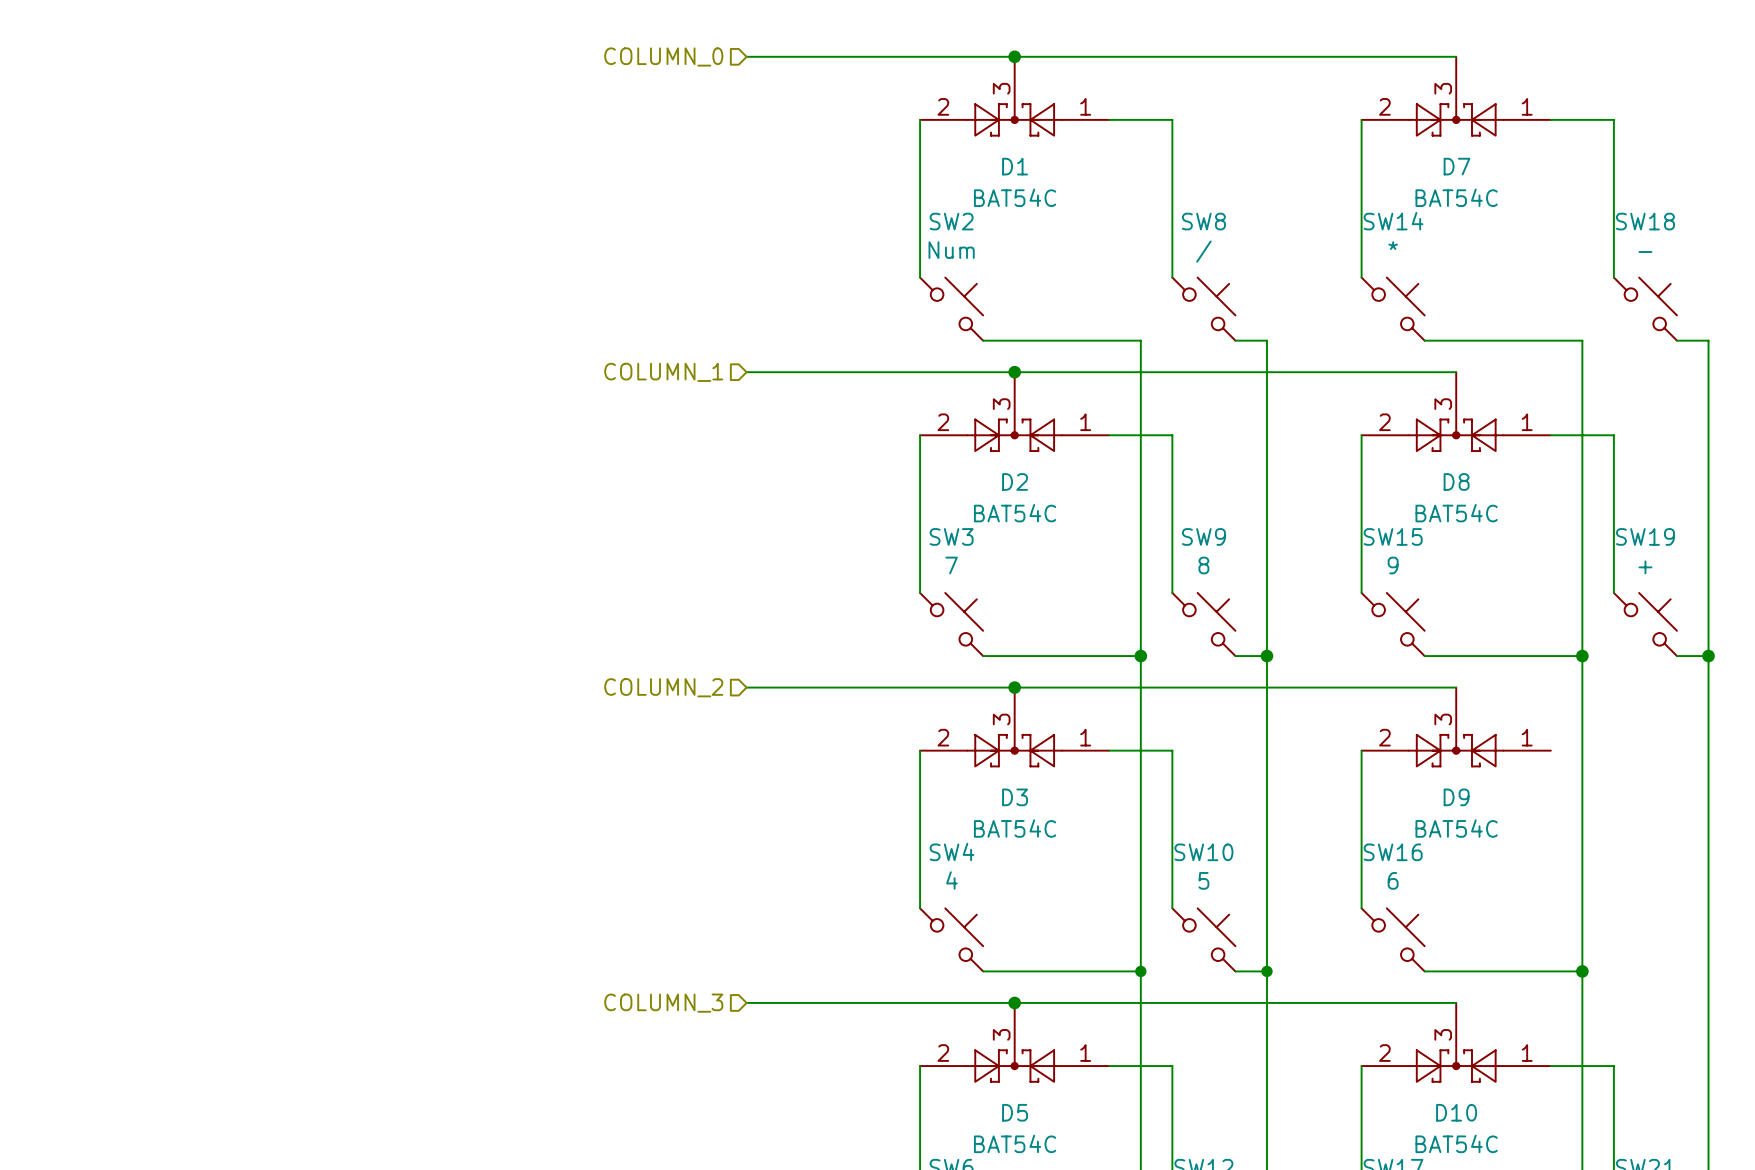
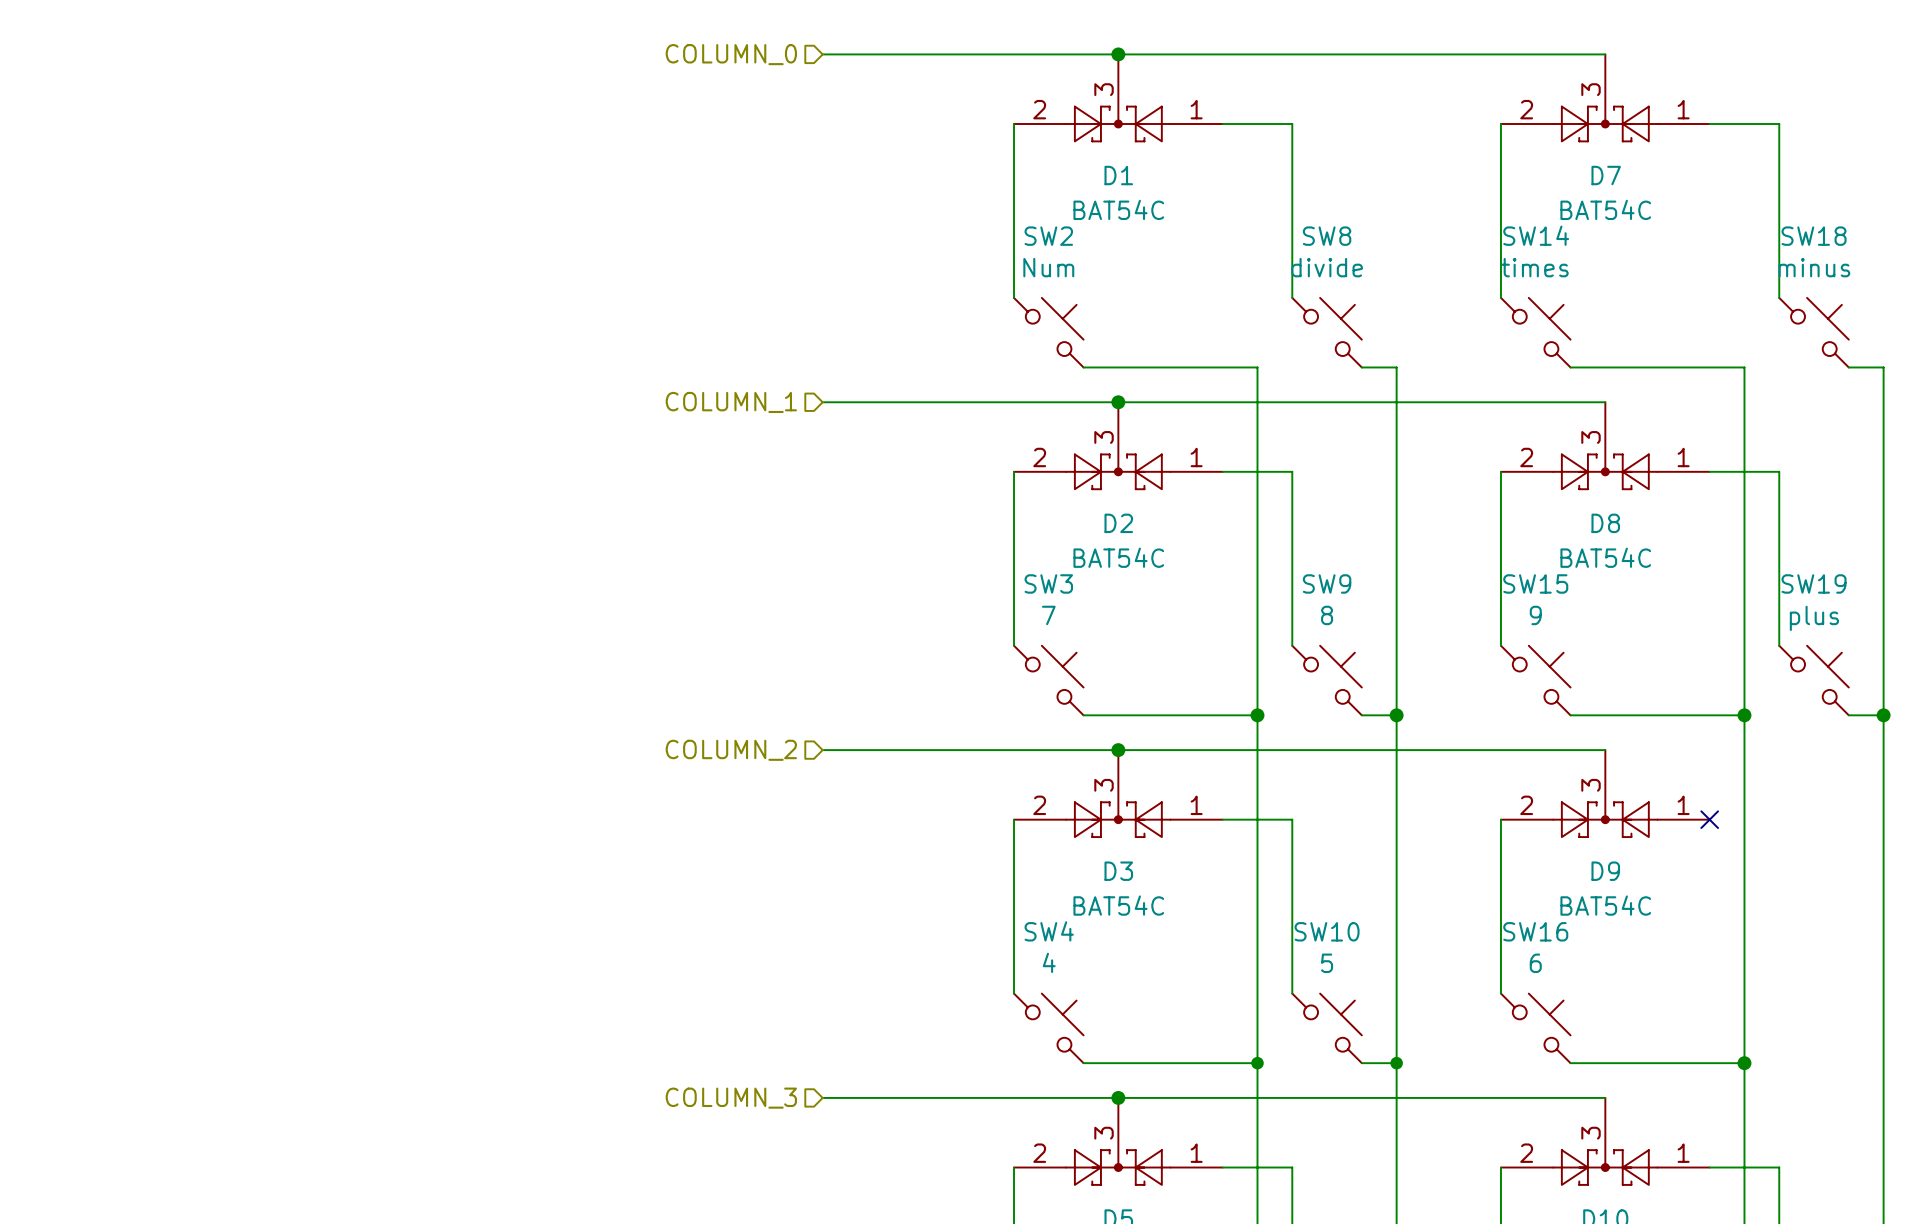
SW14 value: * (1393, 245) -> times (1534, 267)
SW8 value: / (1203, 251) -> divide (1327, 267)
SW18 value: - (1645, 251) -> minus (1814, 267)
SW19 value: + (1645, 567) -> plus (1814, 618)
no-connect mark: none -> (1709, 819)

